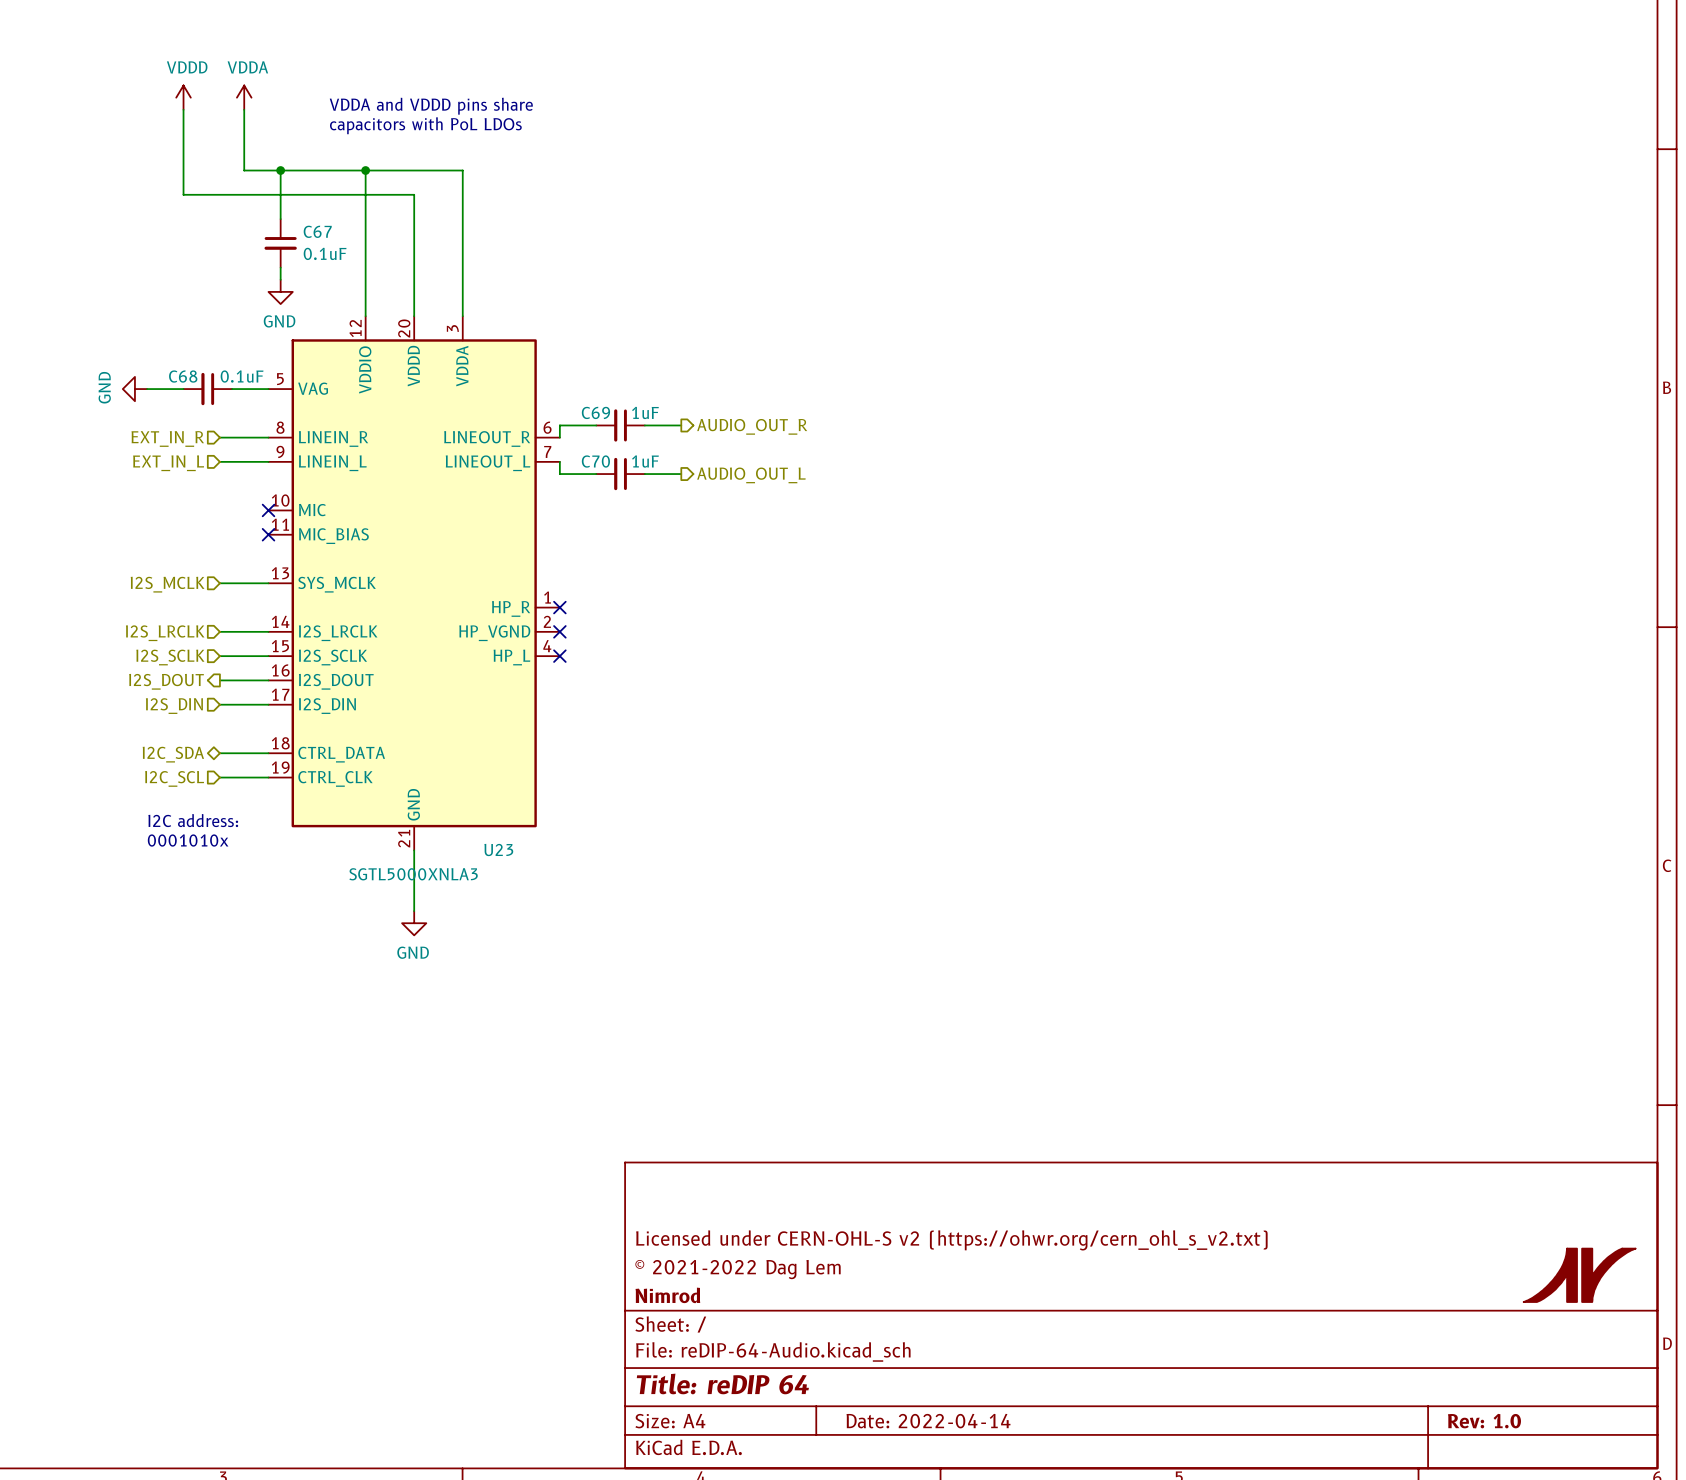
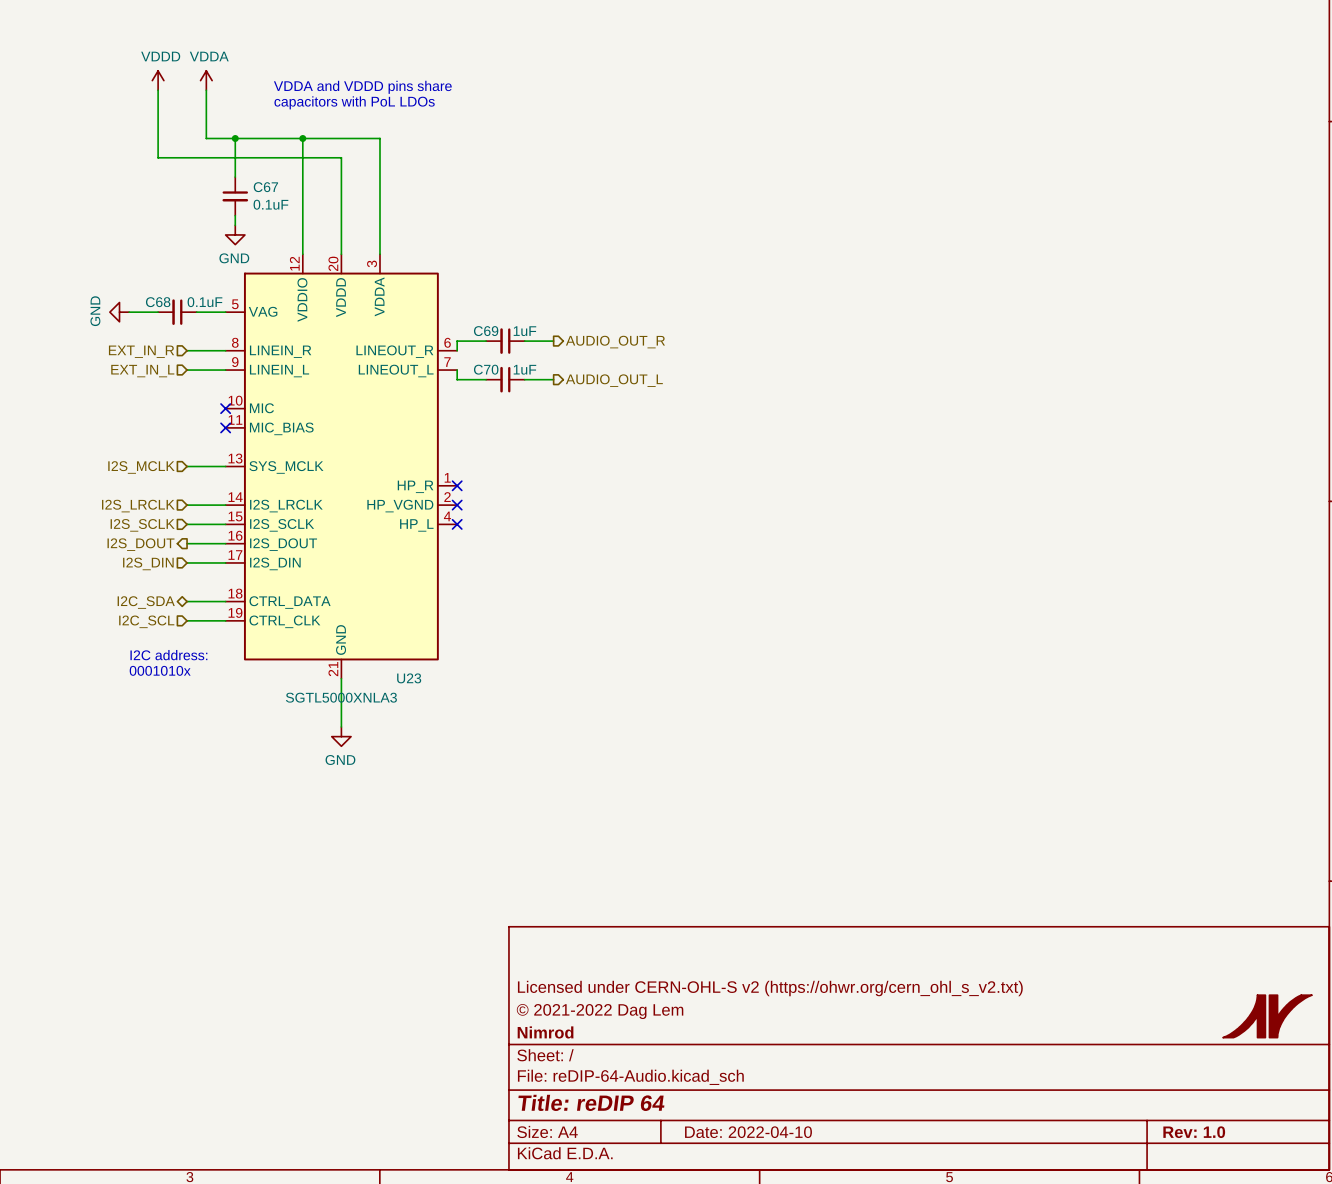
title block: Date: 2022-04-14 (928, 1421) -> Date: 2022-04-10 (748, 1132)

